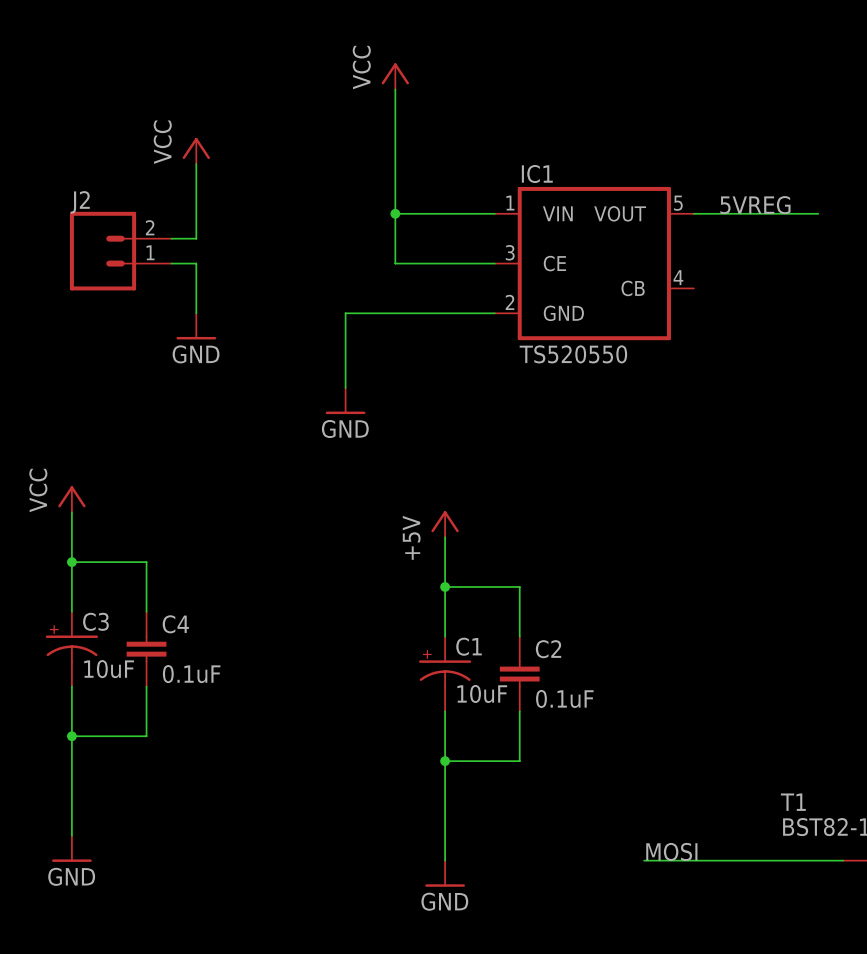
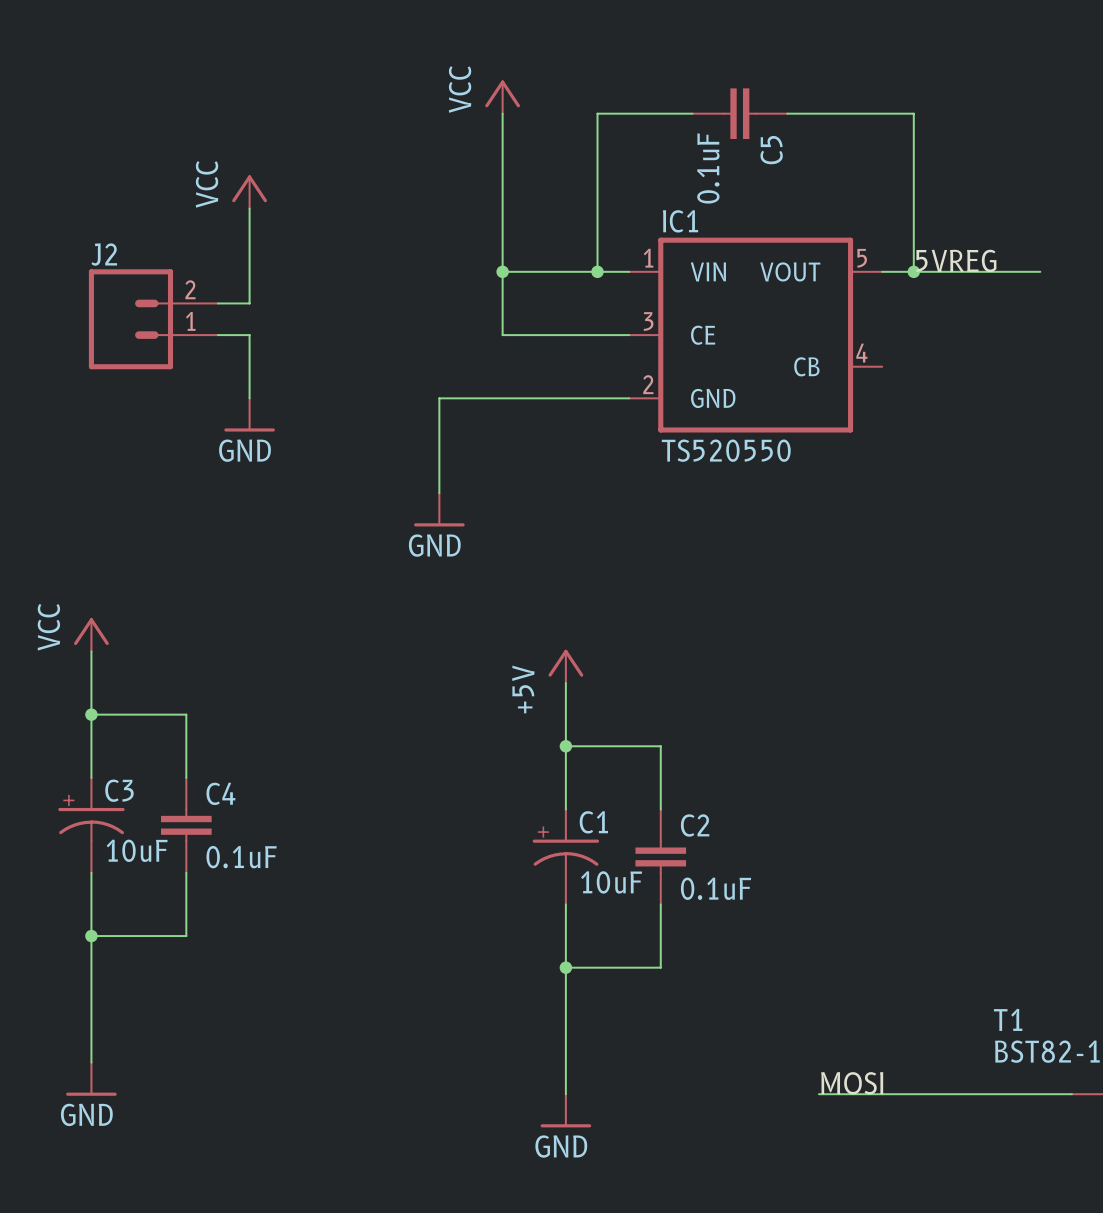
wire: none -> (692, 113) (597, 113) (597, 271)
C5: none -> 0.1uF (739, 113)
wire: none -> (787, 113) (913, 113) (913, 271)
junction: none -> (597, 271)
junction: none -> (913, 271)

